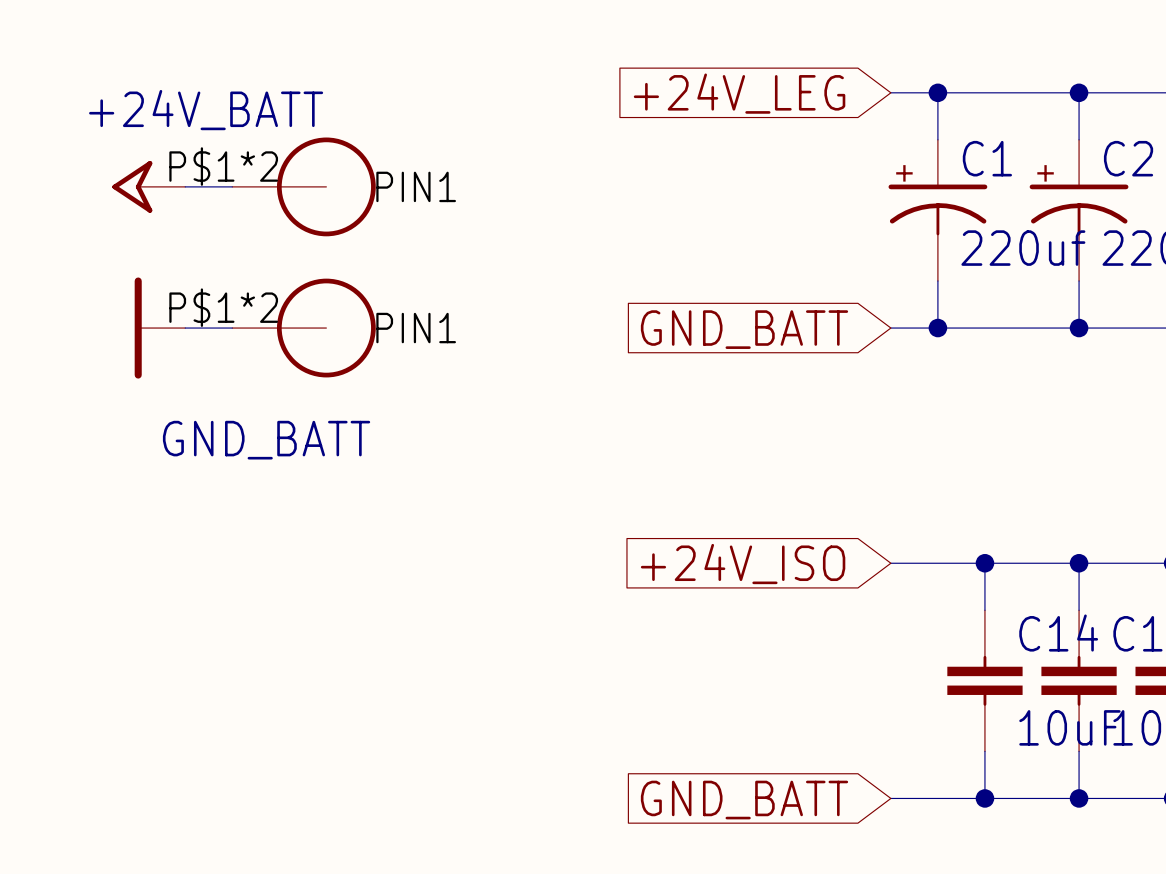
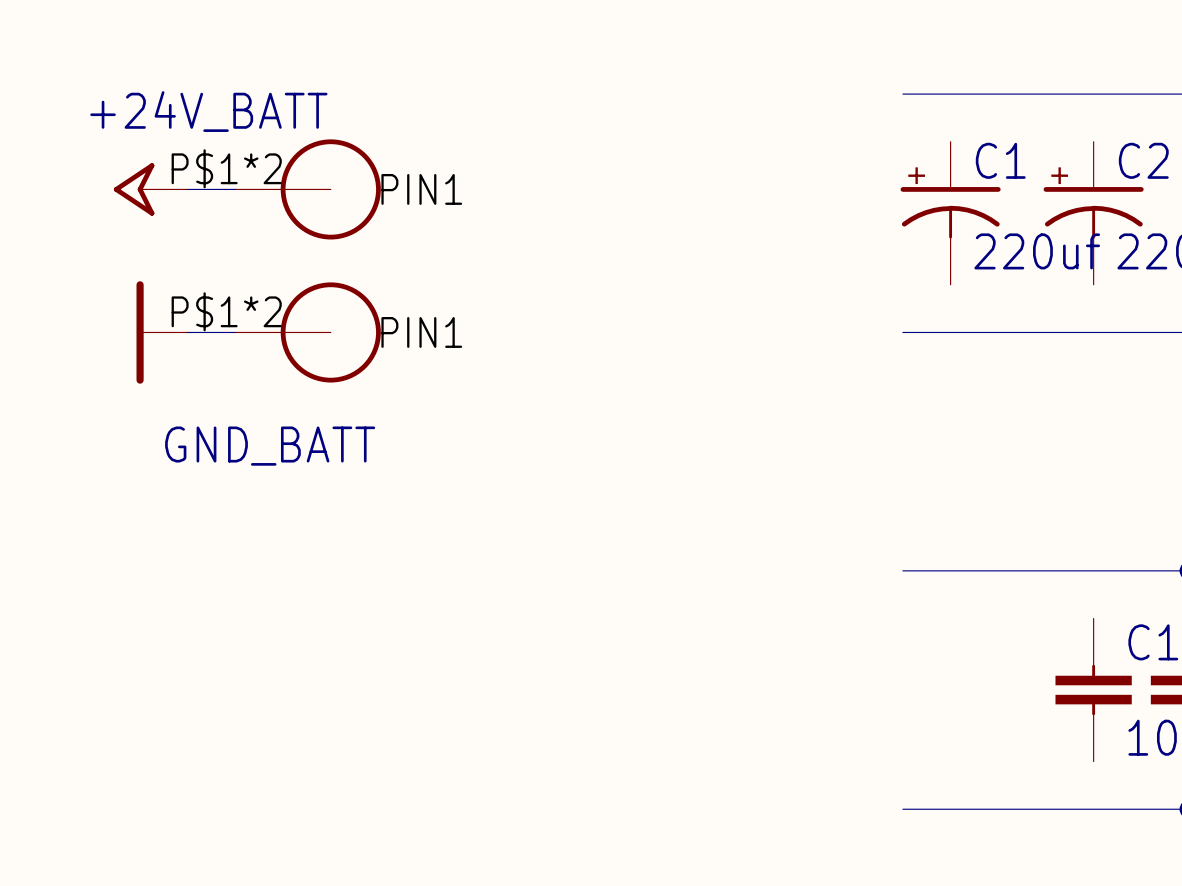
wire: (937, 92) (937, 139) -> none
junction: (937, 92) -> none
wire: (1079, 92) (1079, 139) -> none
junction: (1079, 92) -> none
global label: +24V_LEG (739, 93) -> none
wire: (937, 280) (937, 328) -> none
wire: (1079, 280) (1079, 328) -> none
junction: (937, 328) -> none
junction: (1079, 328) -> none
global label: GND_BATT (744, 329) -> none
wire: (984, 563) (984, 610) -> none
junction: (984, 563) -> none
wire: (1079, 563) (1079, 610) -> none
junction: (1079, 563) -> none
global label: +24V_ISO (743, 564) -> none
C14: 10uF (984, 680) -> none
wire: (984, 751) (984, 798) -> none
wire: (1079, 751) (1079, 798) -> none
junction: (984, 798) -> none
junction: (1079, 798) -> none
global label: GND_BATT (744, 800) -> none

